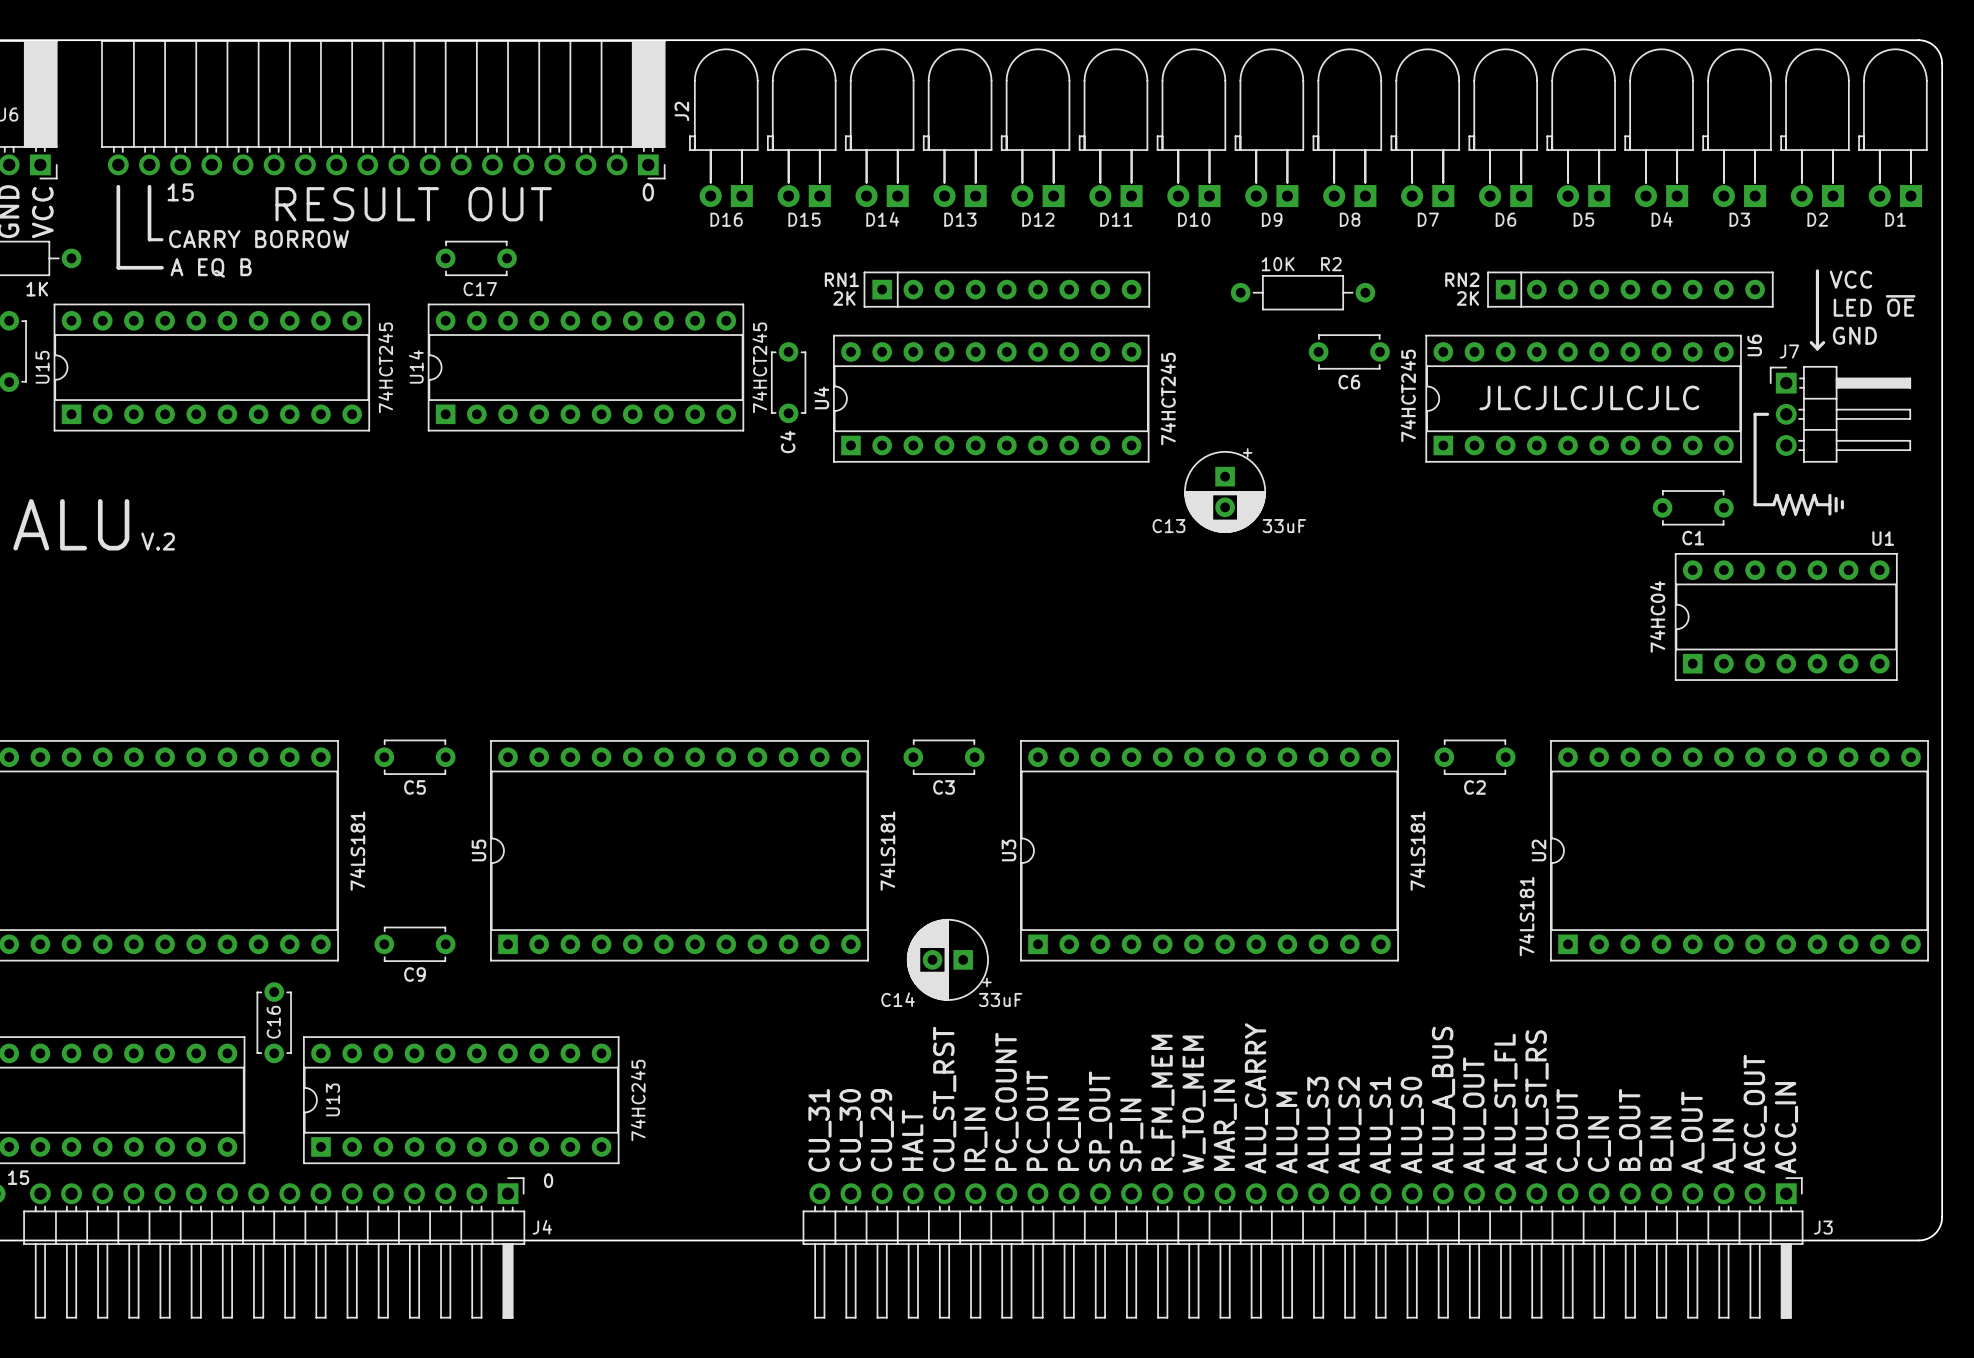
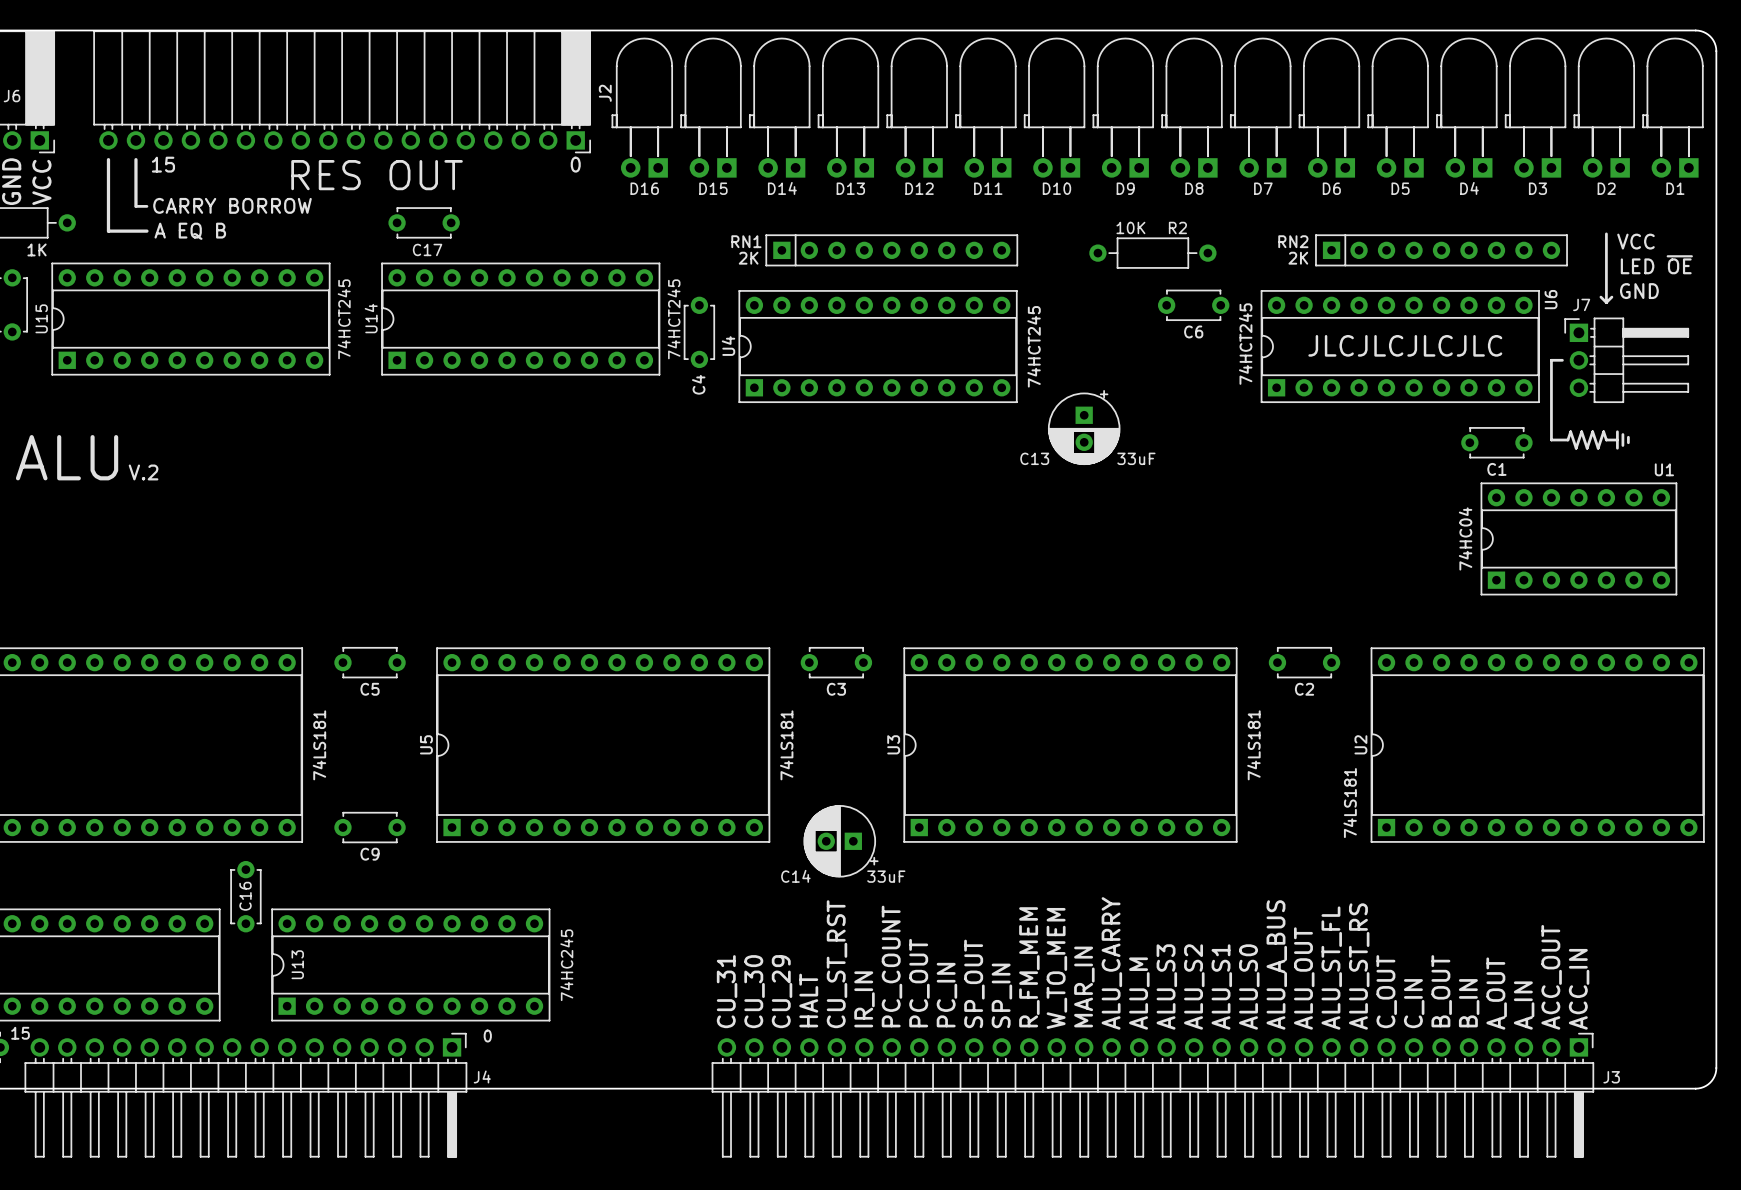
text: RESULT OUT (413, 204) -> RES OUT (377, 175)

